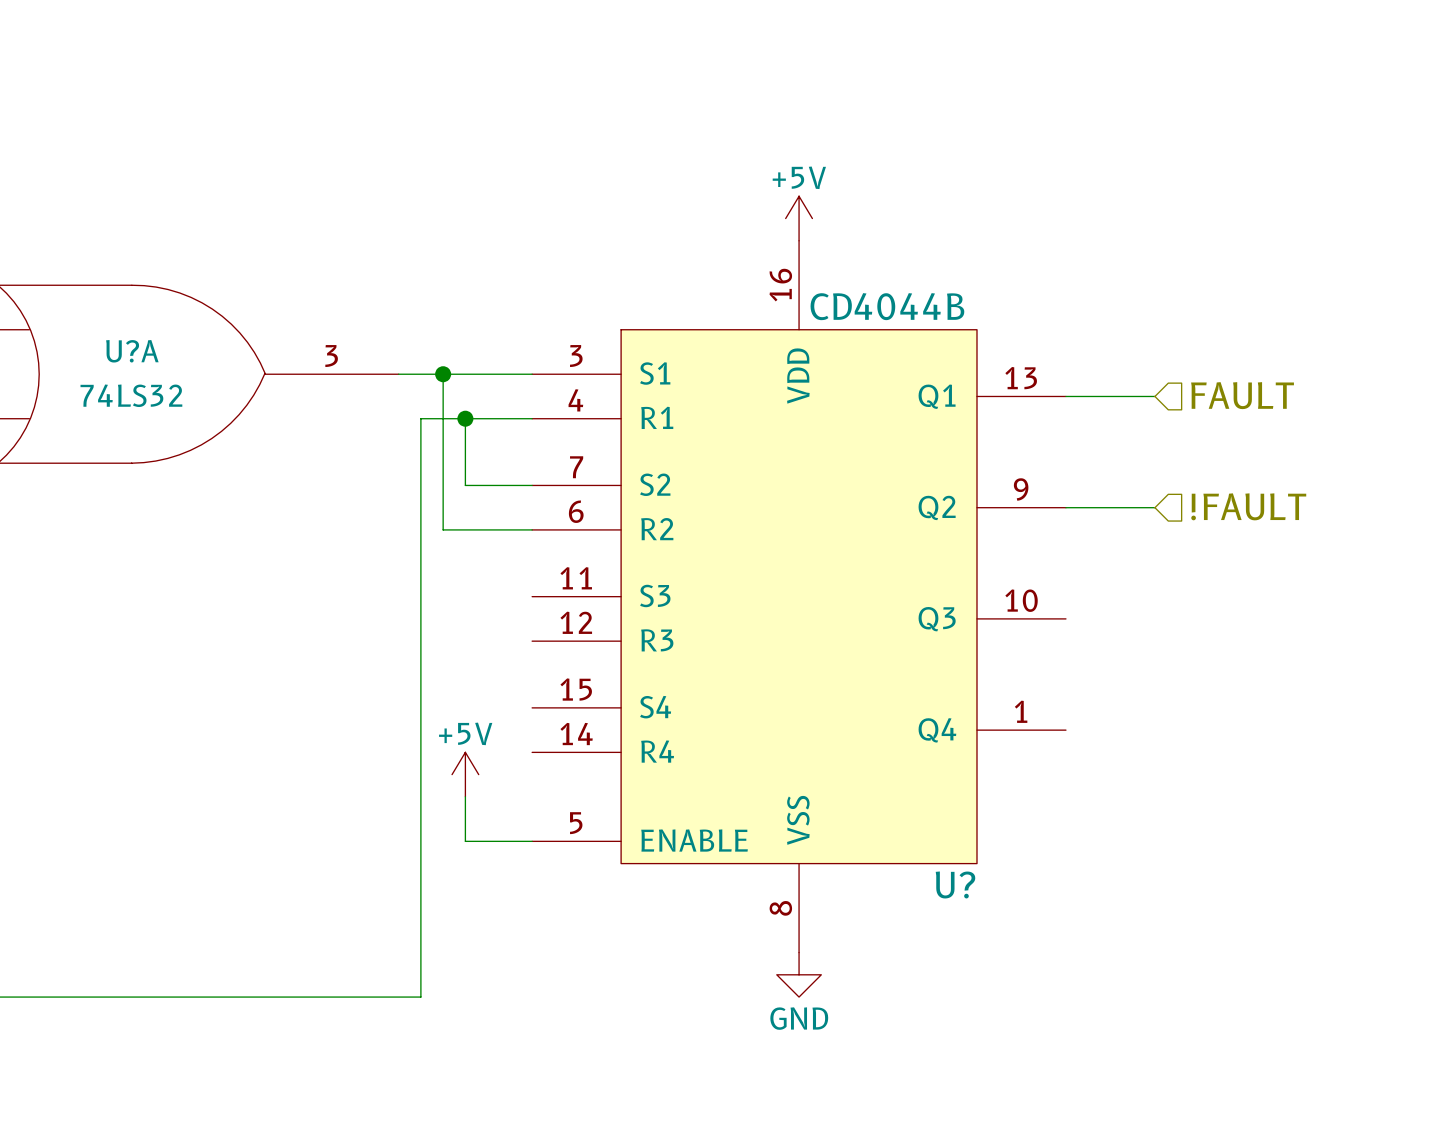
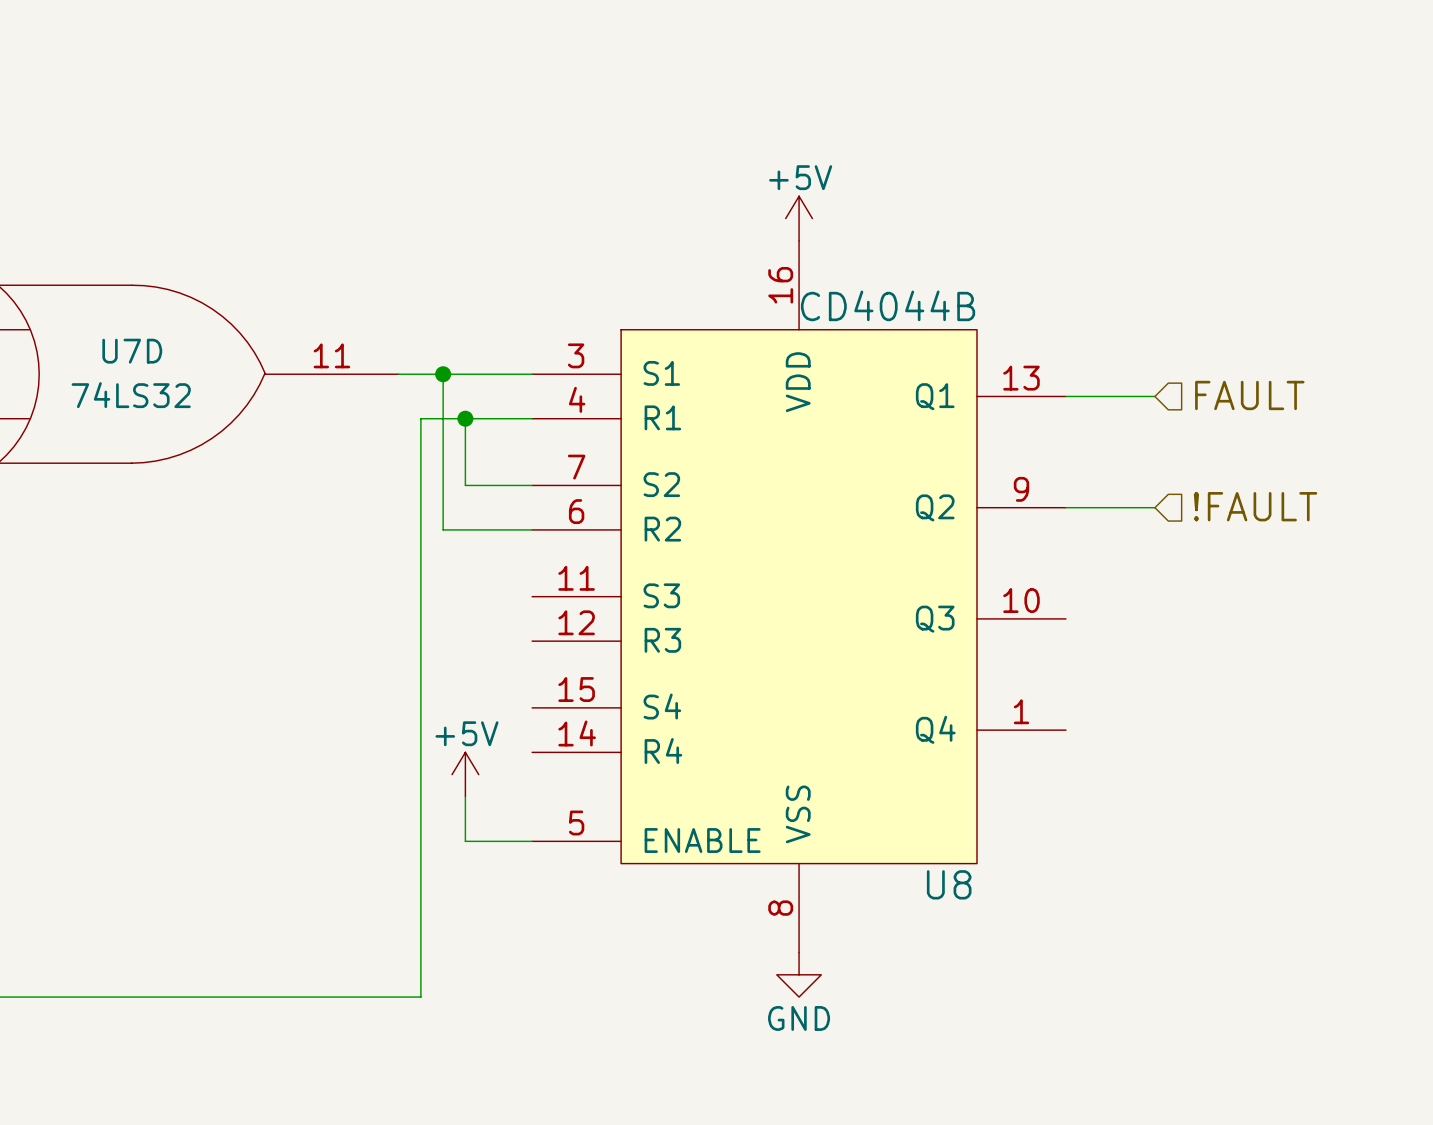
U?A name: U?A (132, 351) -> U7D (132, 351)
U?A pin number: 3 (331, 356) -> 11 (331, 355)
U? name: U? (955, 884) -> U8 (949, 884)

